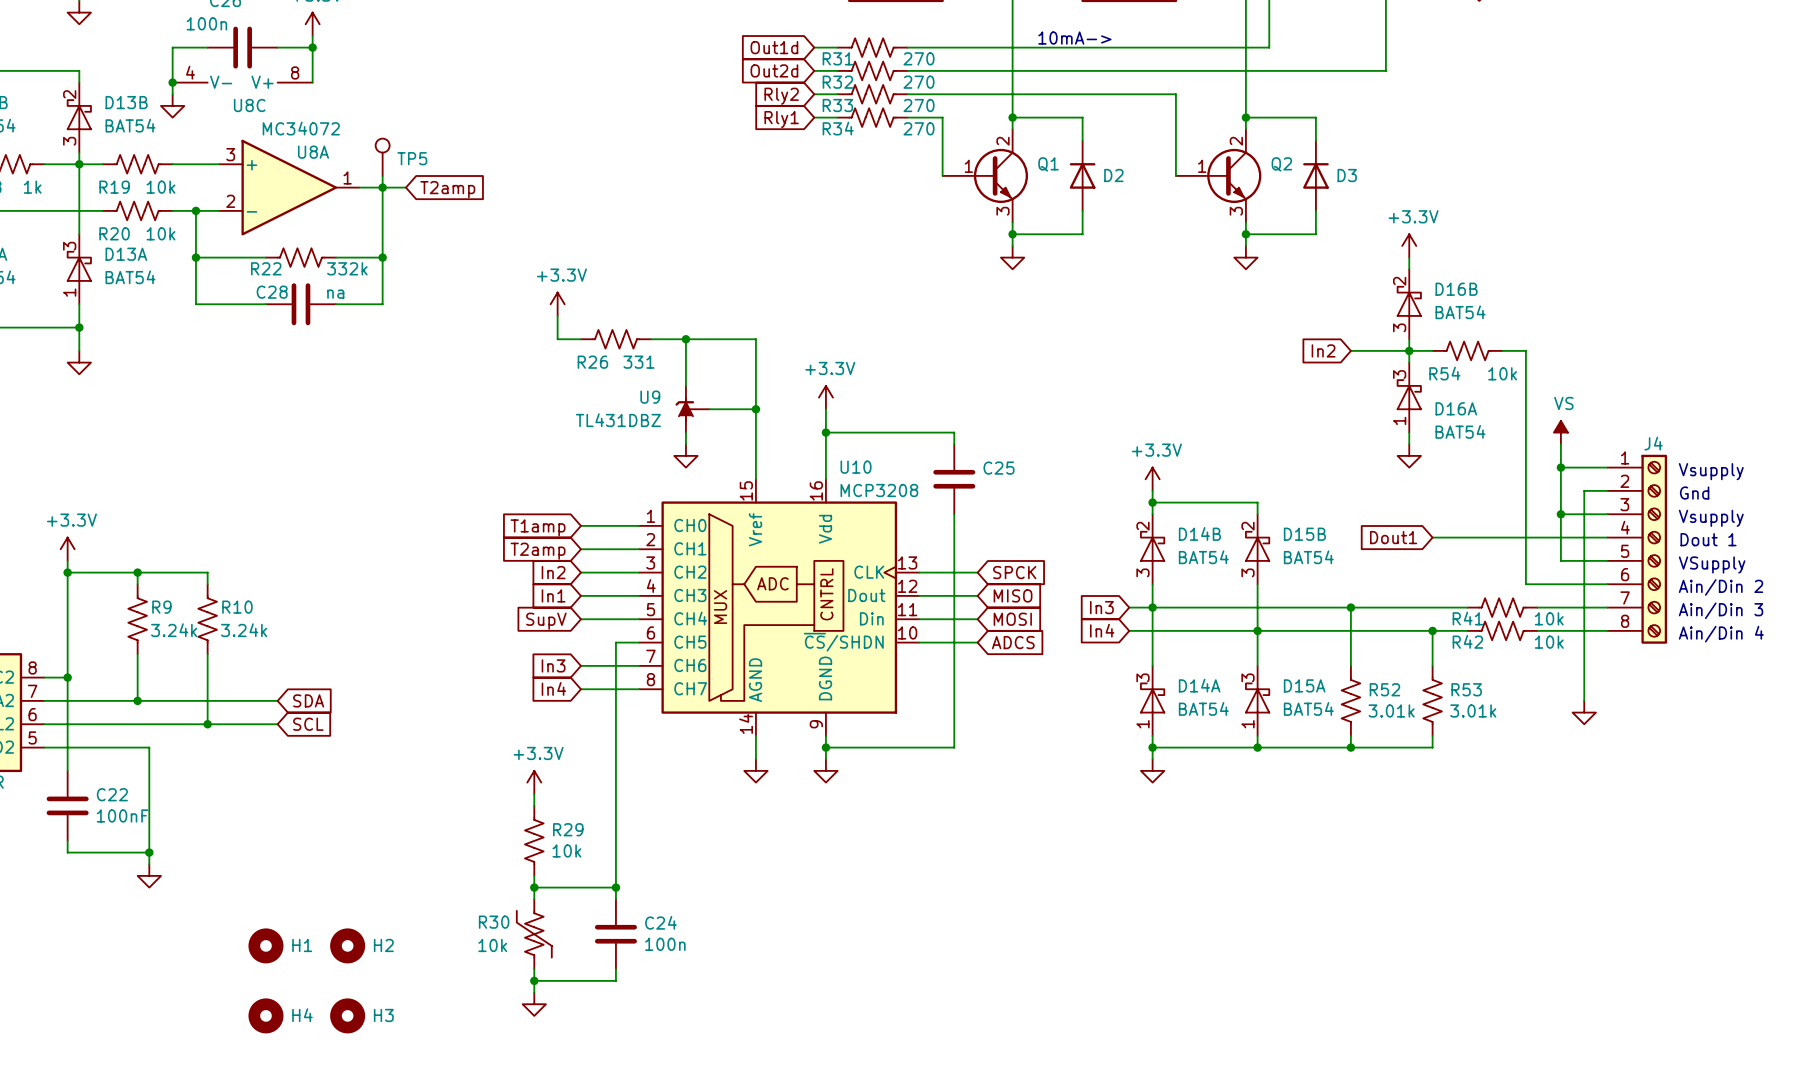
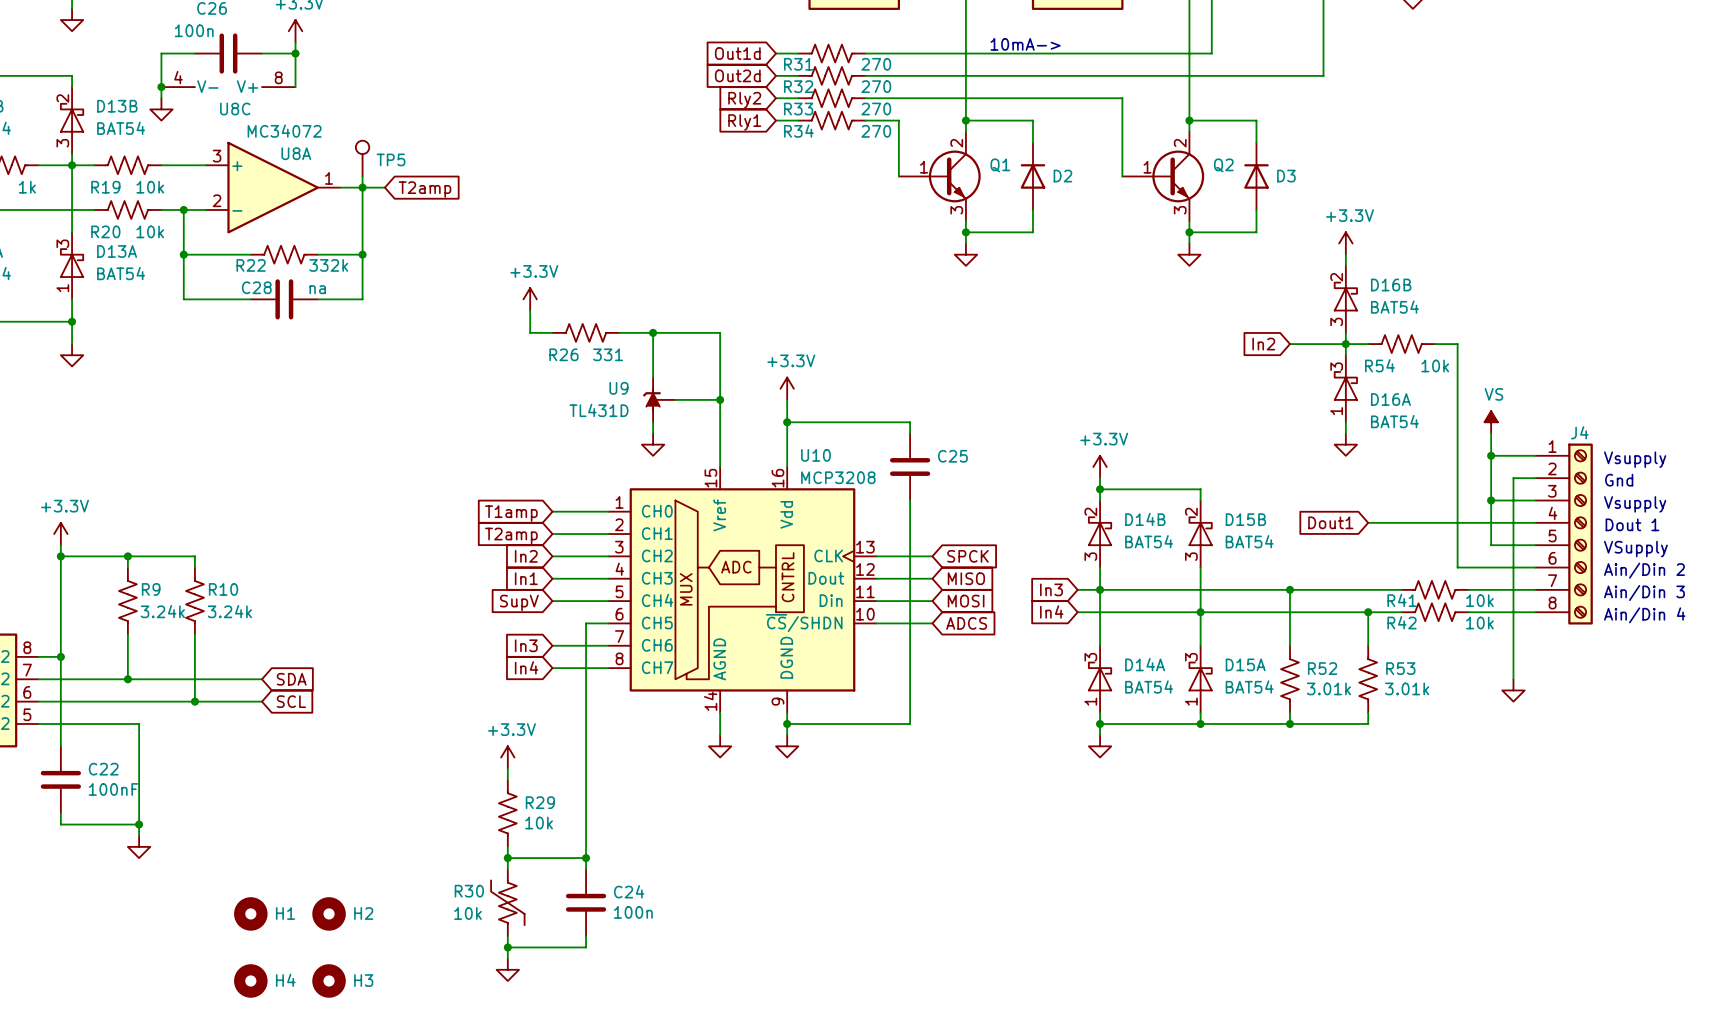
U9 value: TL431DBZ (618, 420) -> TL431D (598, 410)

